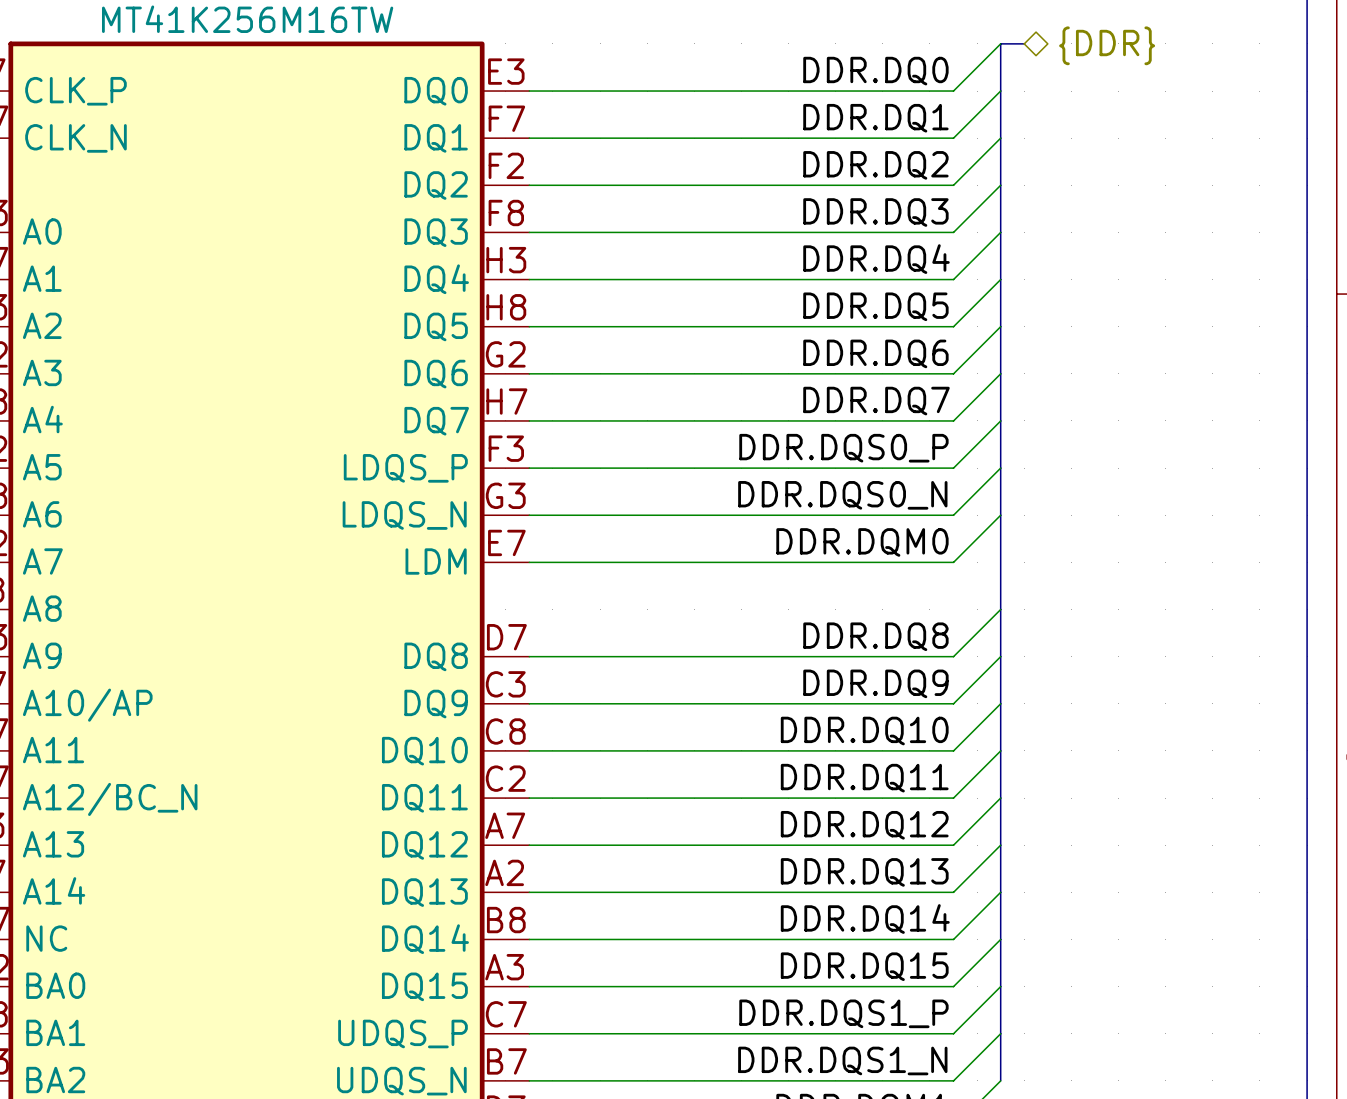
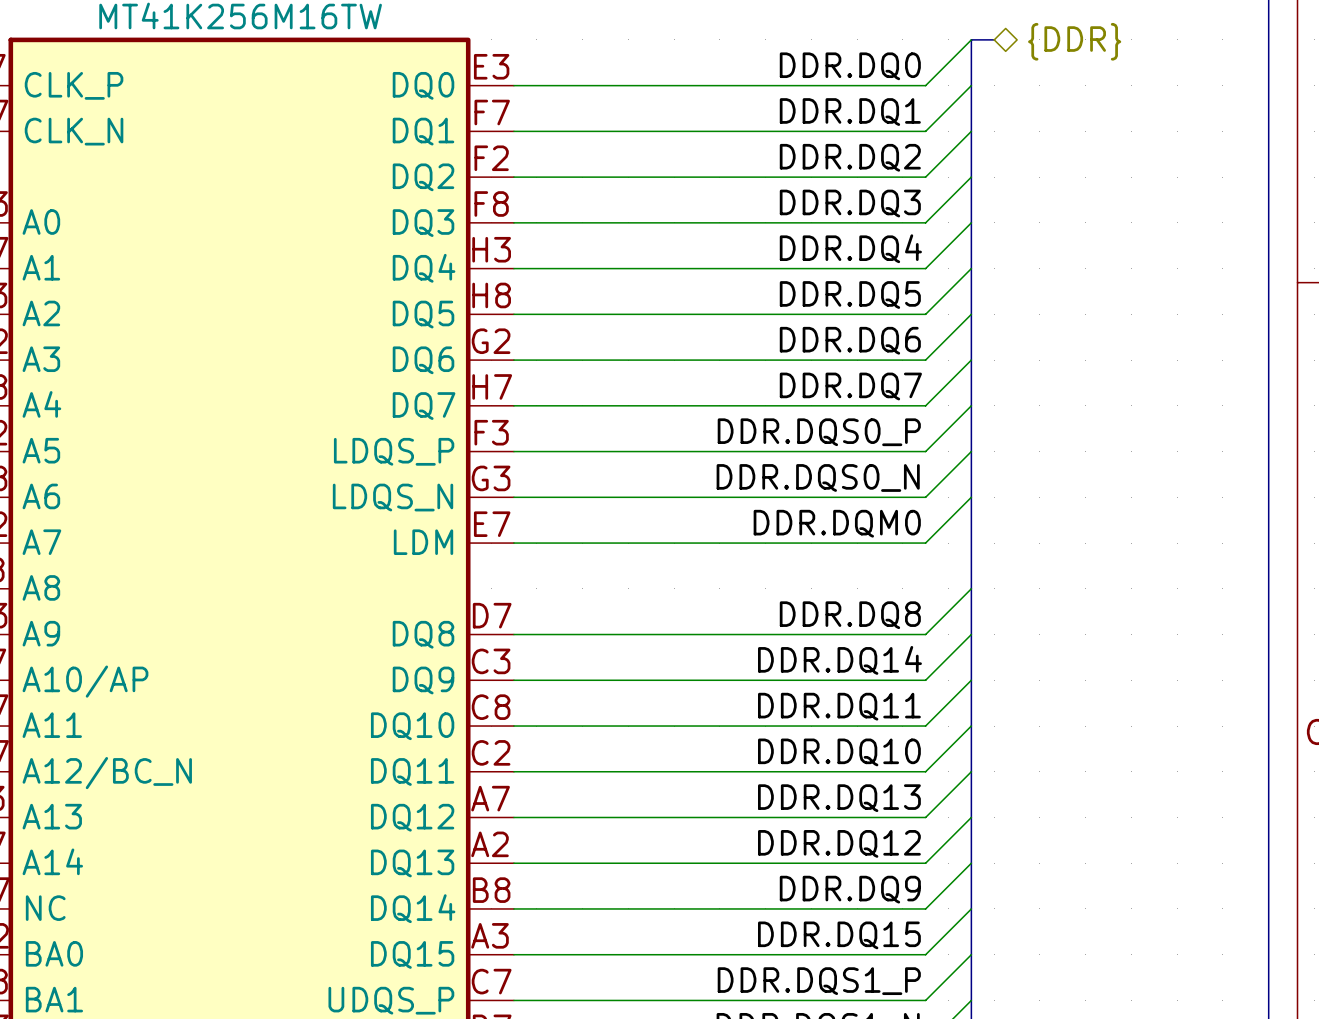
label: DDR.DQ9 (875, 683) -> DDR.DQ14 (839, 660)
label: DDR.DQ10 (864, 731) -> DDR.DQ11 (839, 706)
label: DDR.DQ11 (864, 778) -> DDR.DQ10 (839, 752)
label: DDR.DQ12 (864, 825) -> DDR.DQ13 (839, 798)
label: DDR.DQ13 (864, 872) -> DDR.DQ12 (839, 843)
label: DDR.DQ14 (865, 919) -> DDR.DQ9 (850, 889)

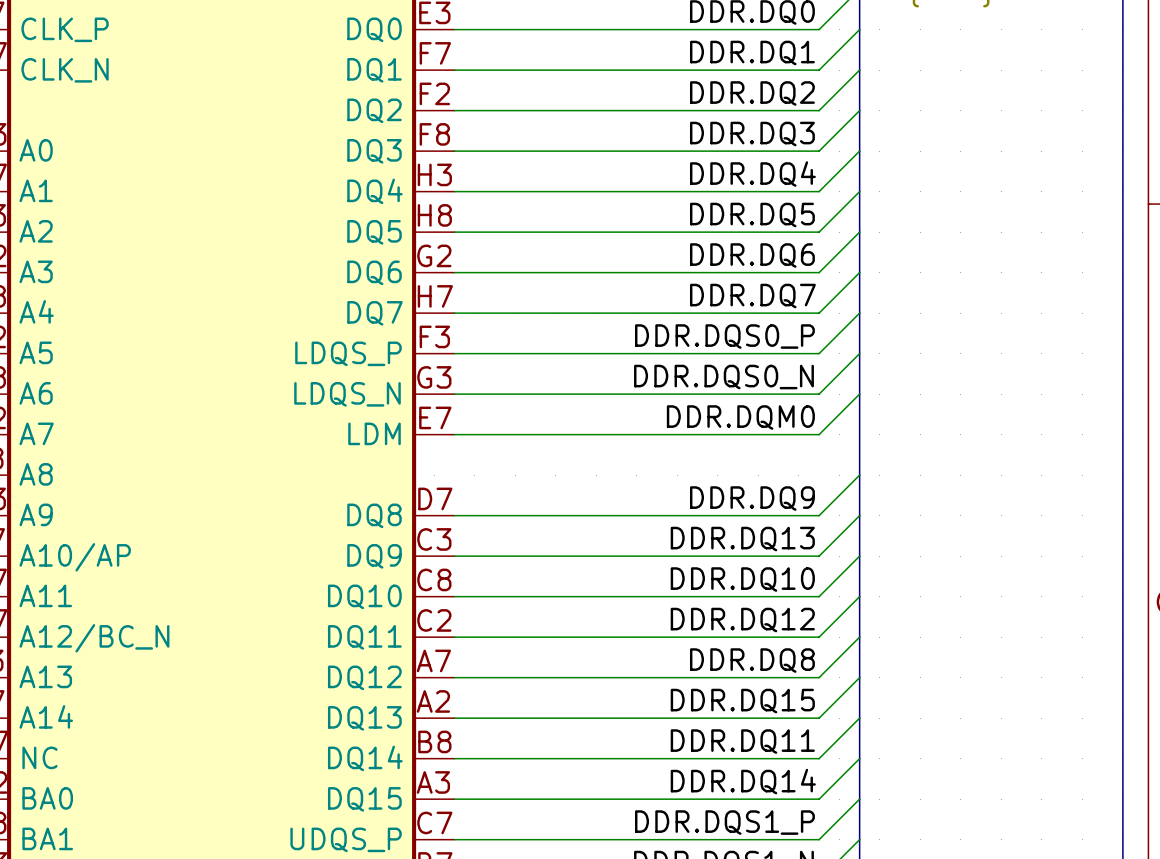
label: DDR.DQ8 (850, 615) -> DDR.DQ9 (752, 498)
label: DDR.DQ14 (839, 660) -> DDR.DQ13 (742, 539)
label: DDR.DQ11 (839, 706) -> DDR.DQ10 (742, 579)
label: DDR.DQ10 (839, 752) -> DDR.DQ12 (742, 620)
label: DDR.DQ13 (839, 798) -> DDR.DQ8 (752, 660)
label: DDR.DQ12 (839, 843) -> DDR.DQ15 (742, 701)
label: DDR.DQ9 (850, 889) -> DDR.DQ11 (742, 741)
label: DDR.DQ15 (839, 935) -> DDR.DQ14 (743, 781)

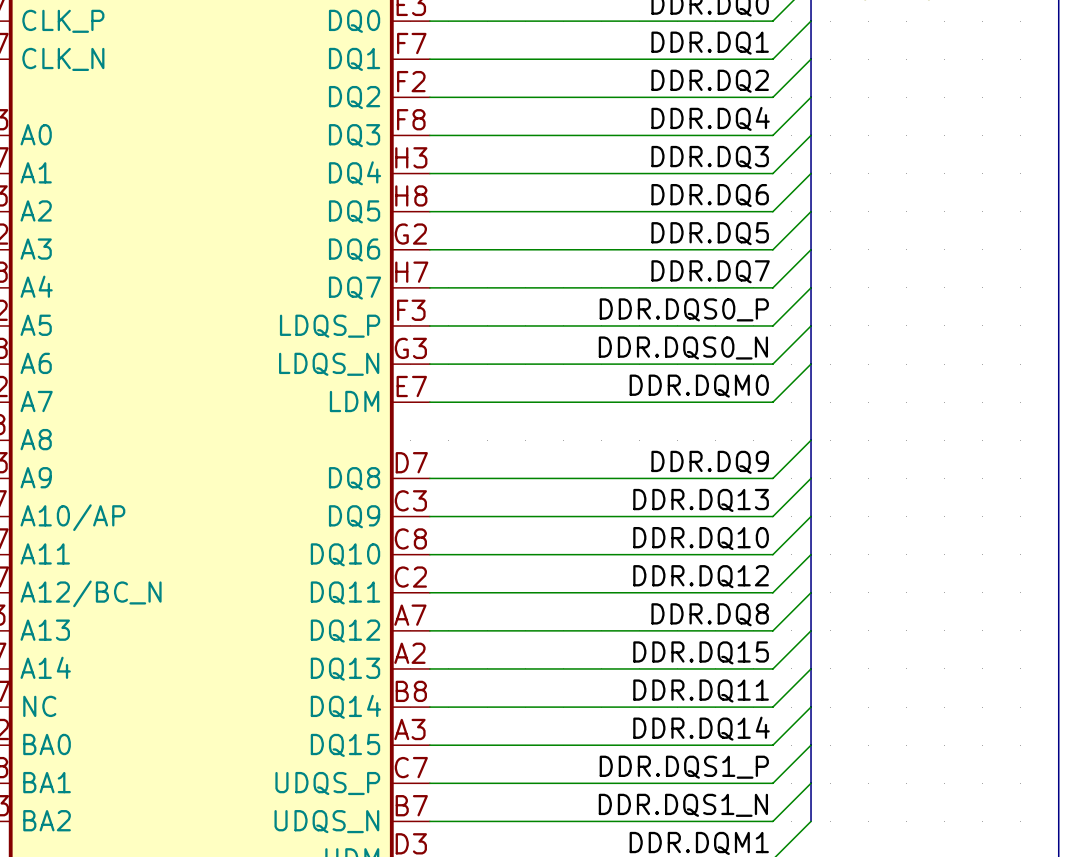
label: DDR.DQ3 (752, 134) -> DDR.DQ4 (710, 118)
label: DDR.DQ4 (752, 174) -> DDR.DQ3 (710, 157)
label: DDR.DQ5 (752, 215) -> DDR.DQ6 (710, 195)
label: DDR.DQ6 (752, 255) -> DDR.DQ5 (710, 233)

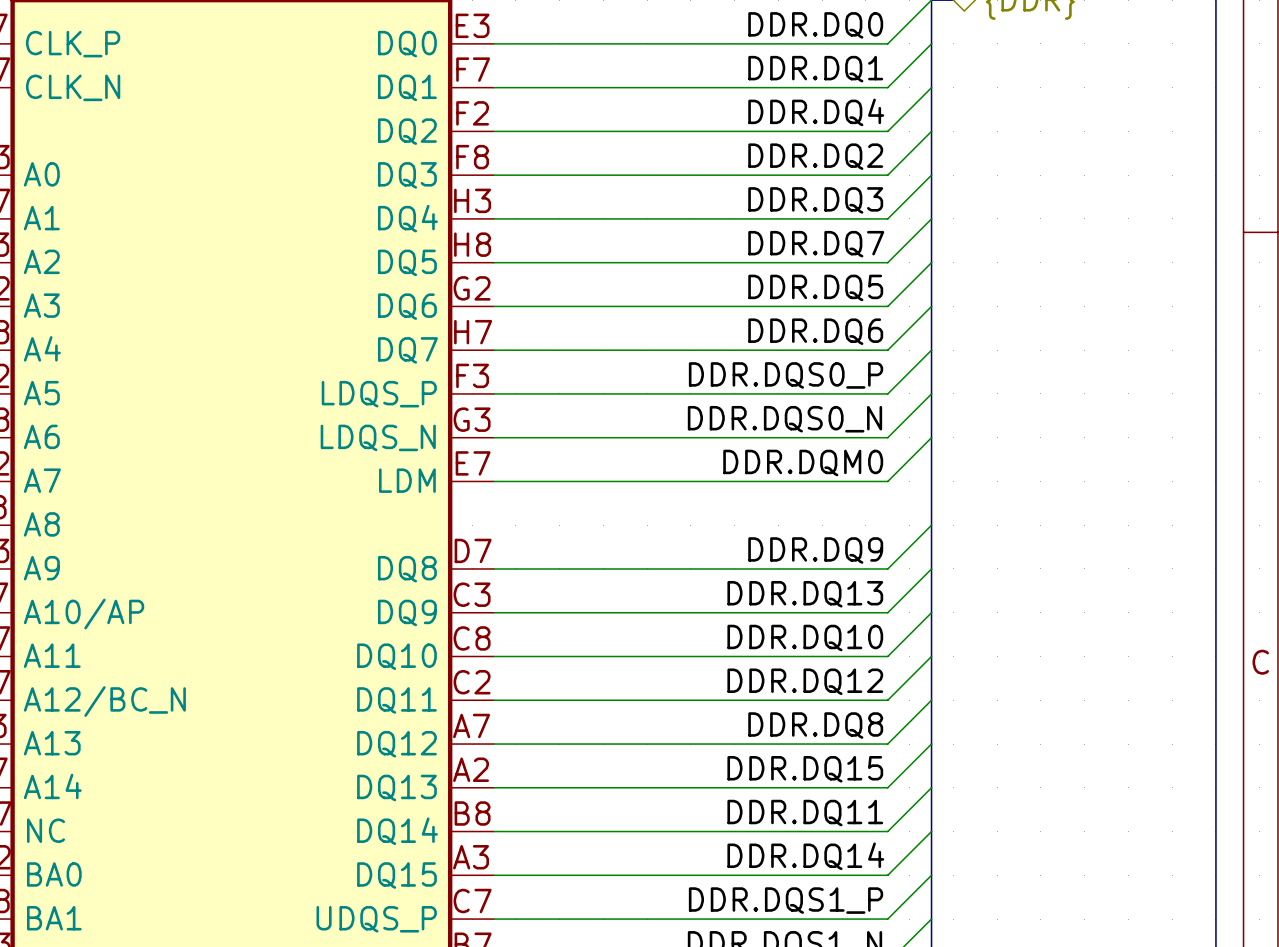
label: DDR.DQ2 (710, 81) -> DDR.DQ4 (816, 112)
label: DDR.DQ4 (710, 118) -> DDR.DQ2 (815, 156)
label: DDR.DQ6 (710, 195) -> DDR.DQ7 (816, 244)
label: DDR.DQ7 (710, 271) -> DDR.DQ6 (815, 331)

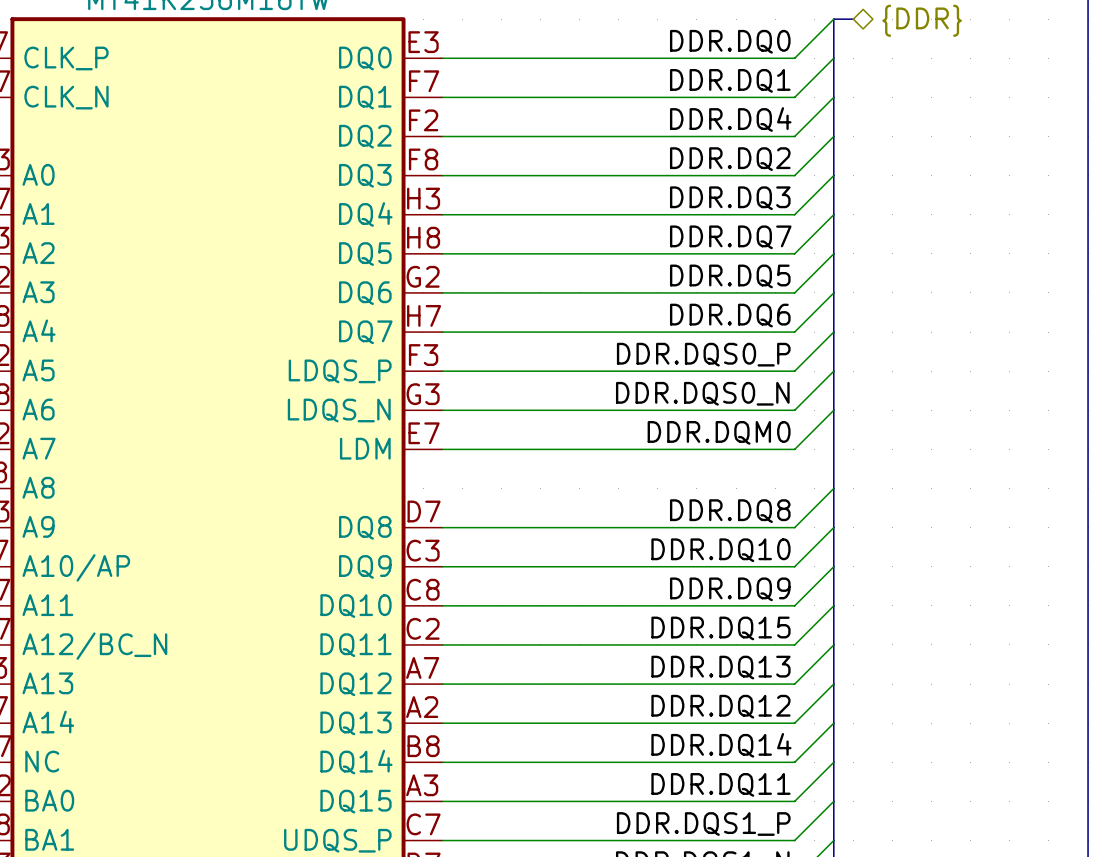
label: DDR.DQ9 (815, 550) -> DDR.DQ8 (730, 511)
label: DDR.DQ13 (805, 594) -> DDR.DQ10 (720, 550)
label: DDR.DQ10 (805, 638) -> DDR.DQ9 (730, 589)
label: DDR.DQ12 (805, 681) -> DDR.DQ15 (720, 628)
label: DDR.DQ8 (815, 725) -> DDR.DQ13 (720, 667)
label: DDR.DQ15 (805, 769) -> DDR.DQ12 (720, 706)
label: DDR.DQ11 (805, 813) -> DDR.DQ14 (721, 745)
label: DDR.DQ14 (805, 856) -> DDR.DQ11 (720, 784)

